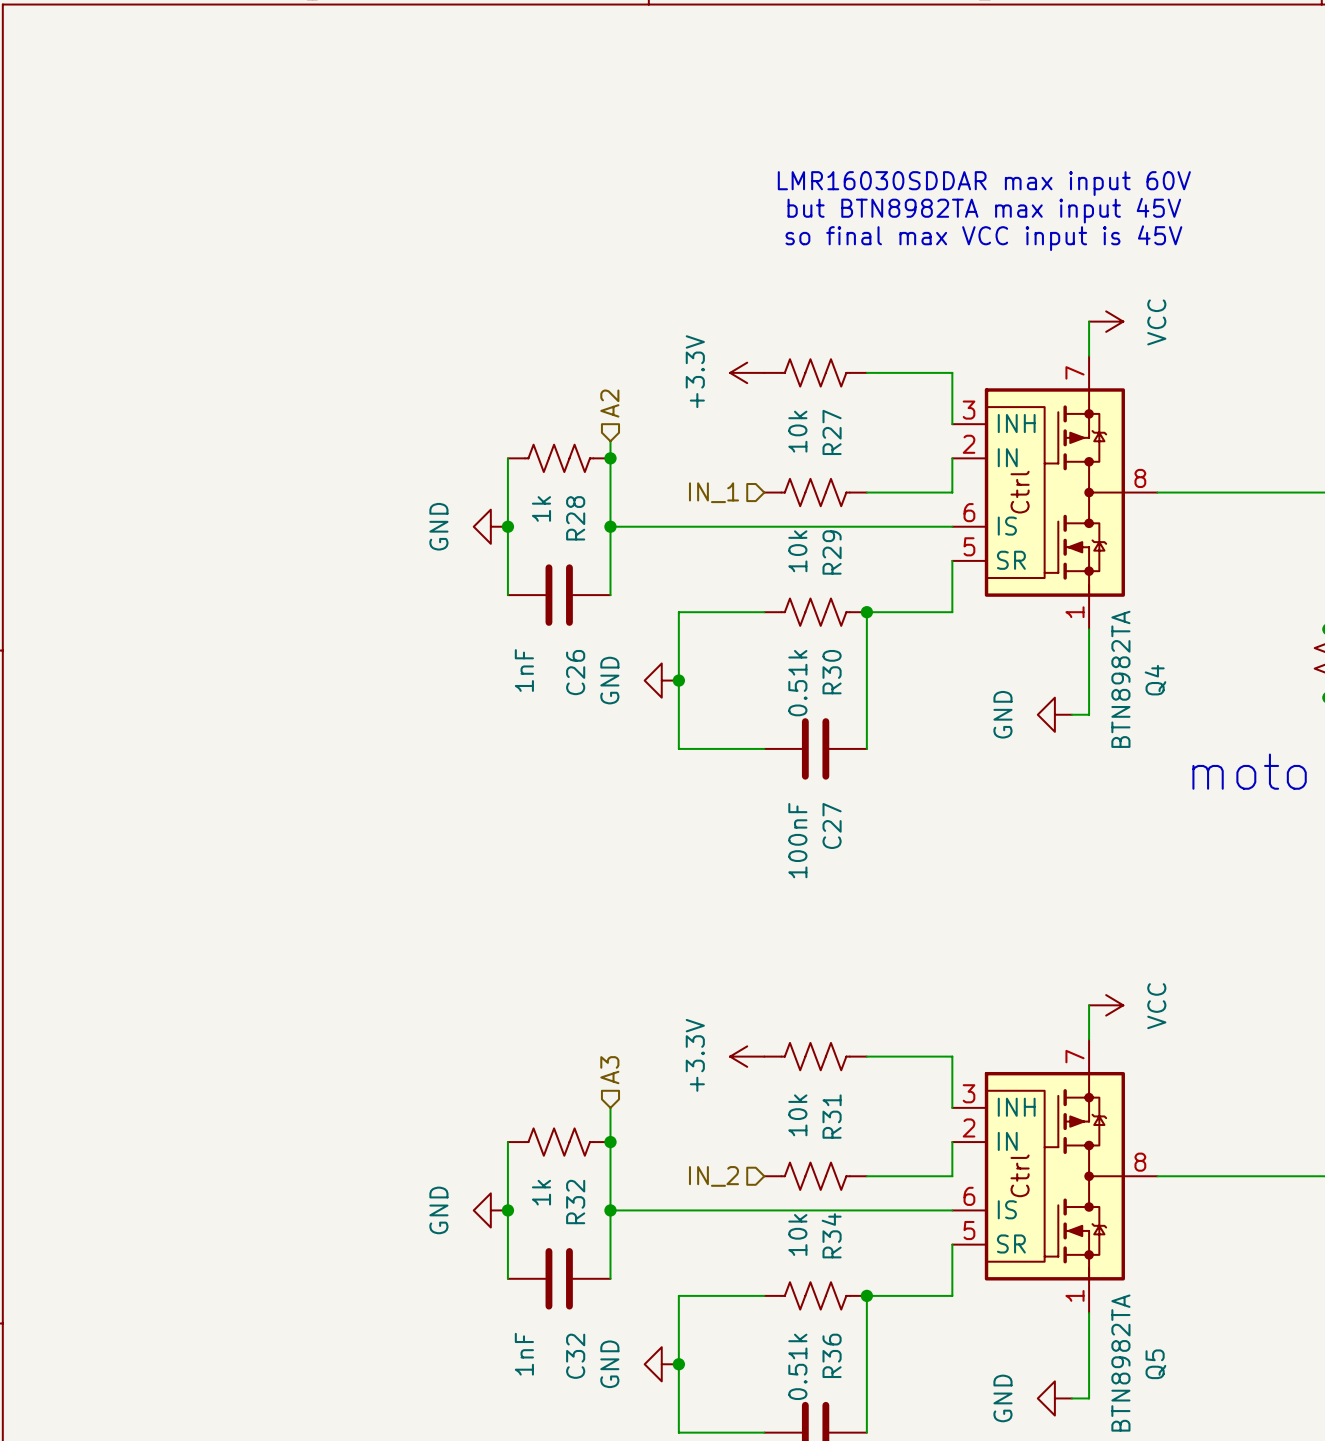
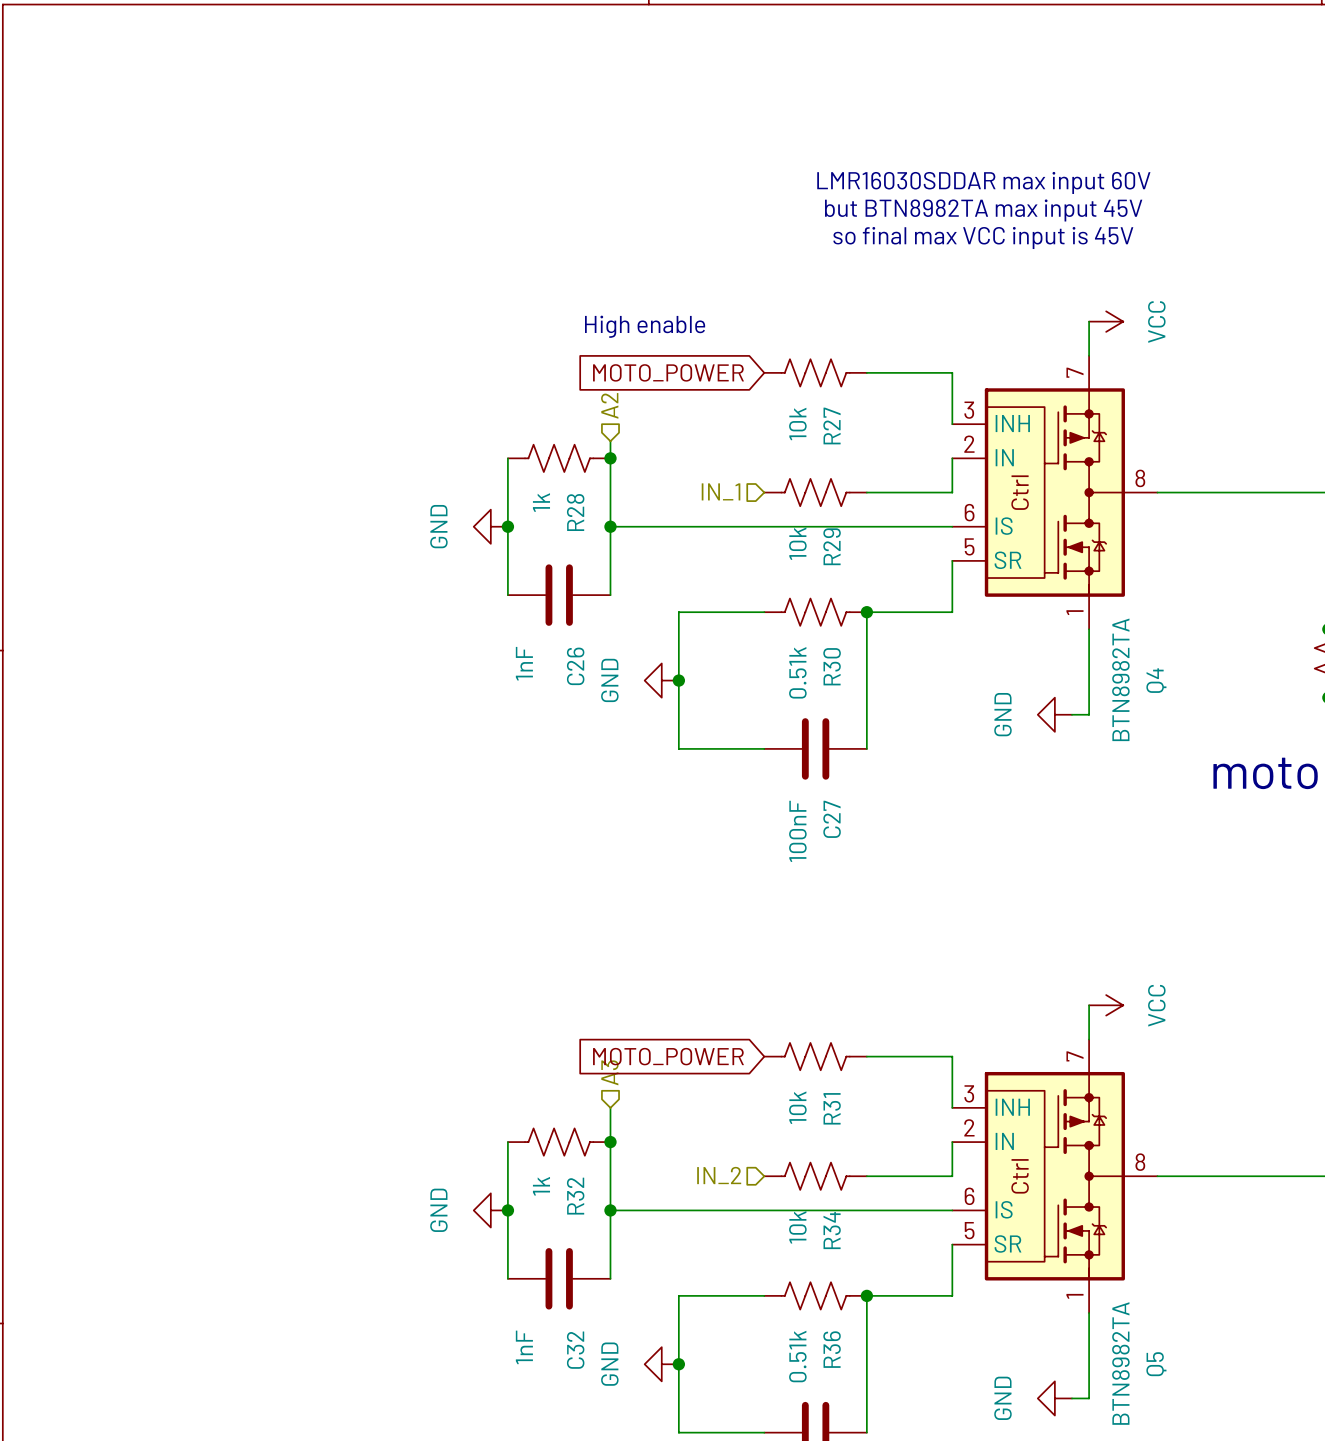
text: none -> High enable (645, 326)
power symbol: +3.3V (747, 372) -> none
global label: none -> MOTO_POWER (668, 372)
power symbol: +3.3V (747, 1056) -> none
global label: none -> MOTO_POWER (668, 1056)

